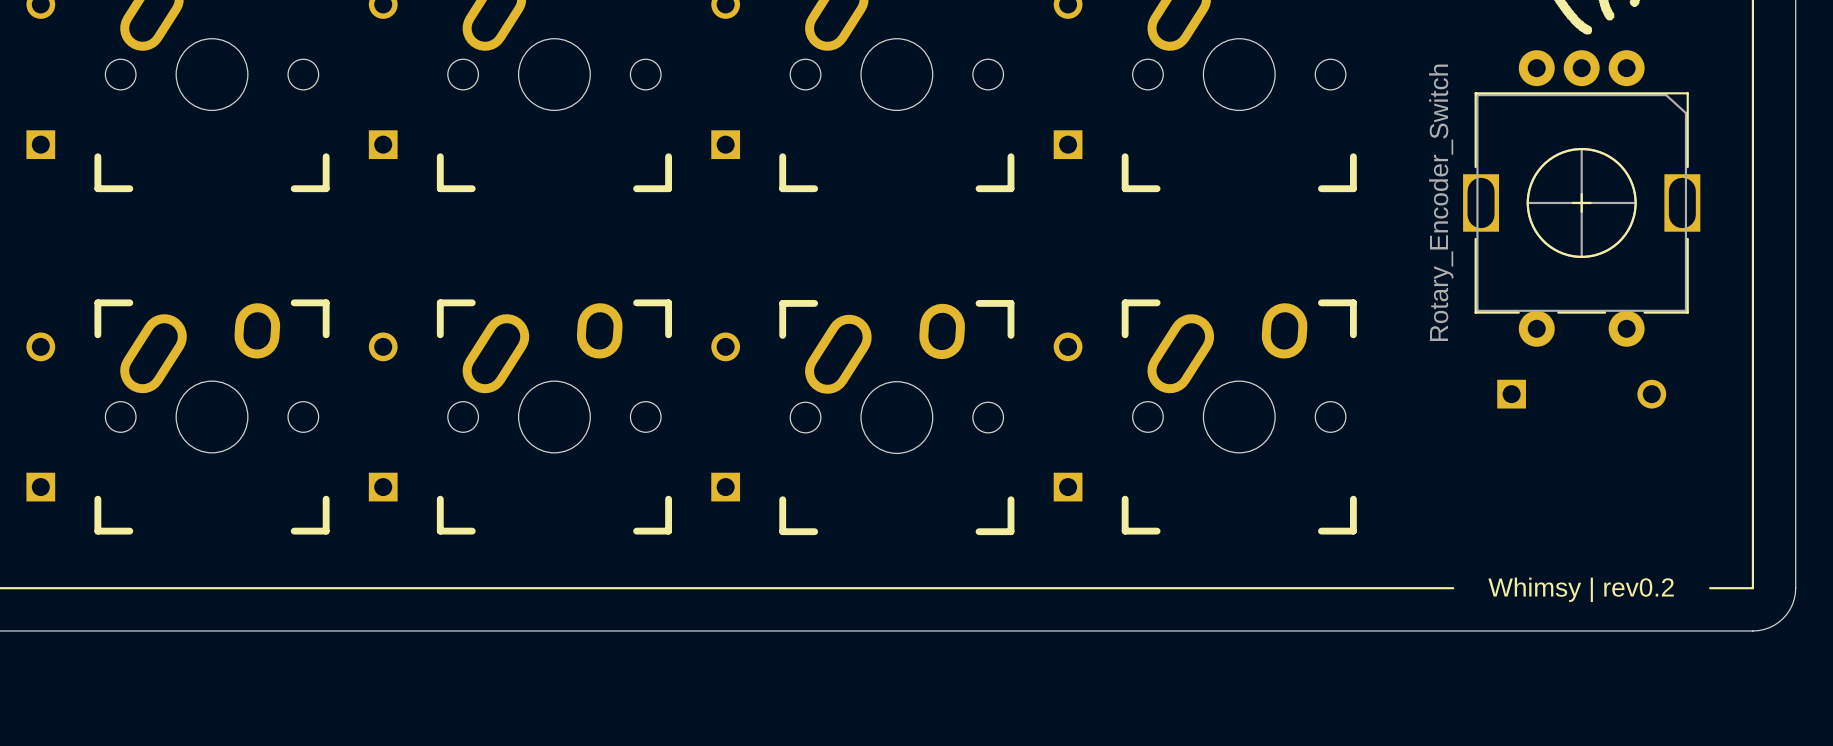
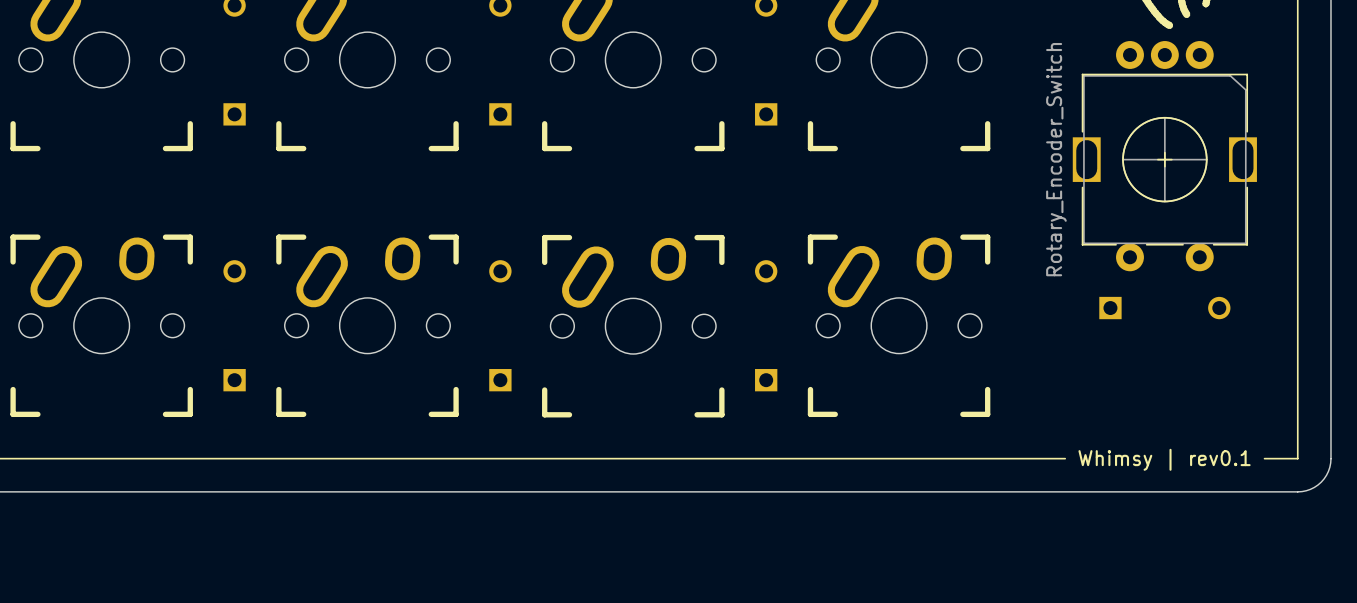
text: Whimsy | rev0.2 (1581, 589) -> Whimsy | rev0.1 (1164, 459)

